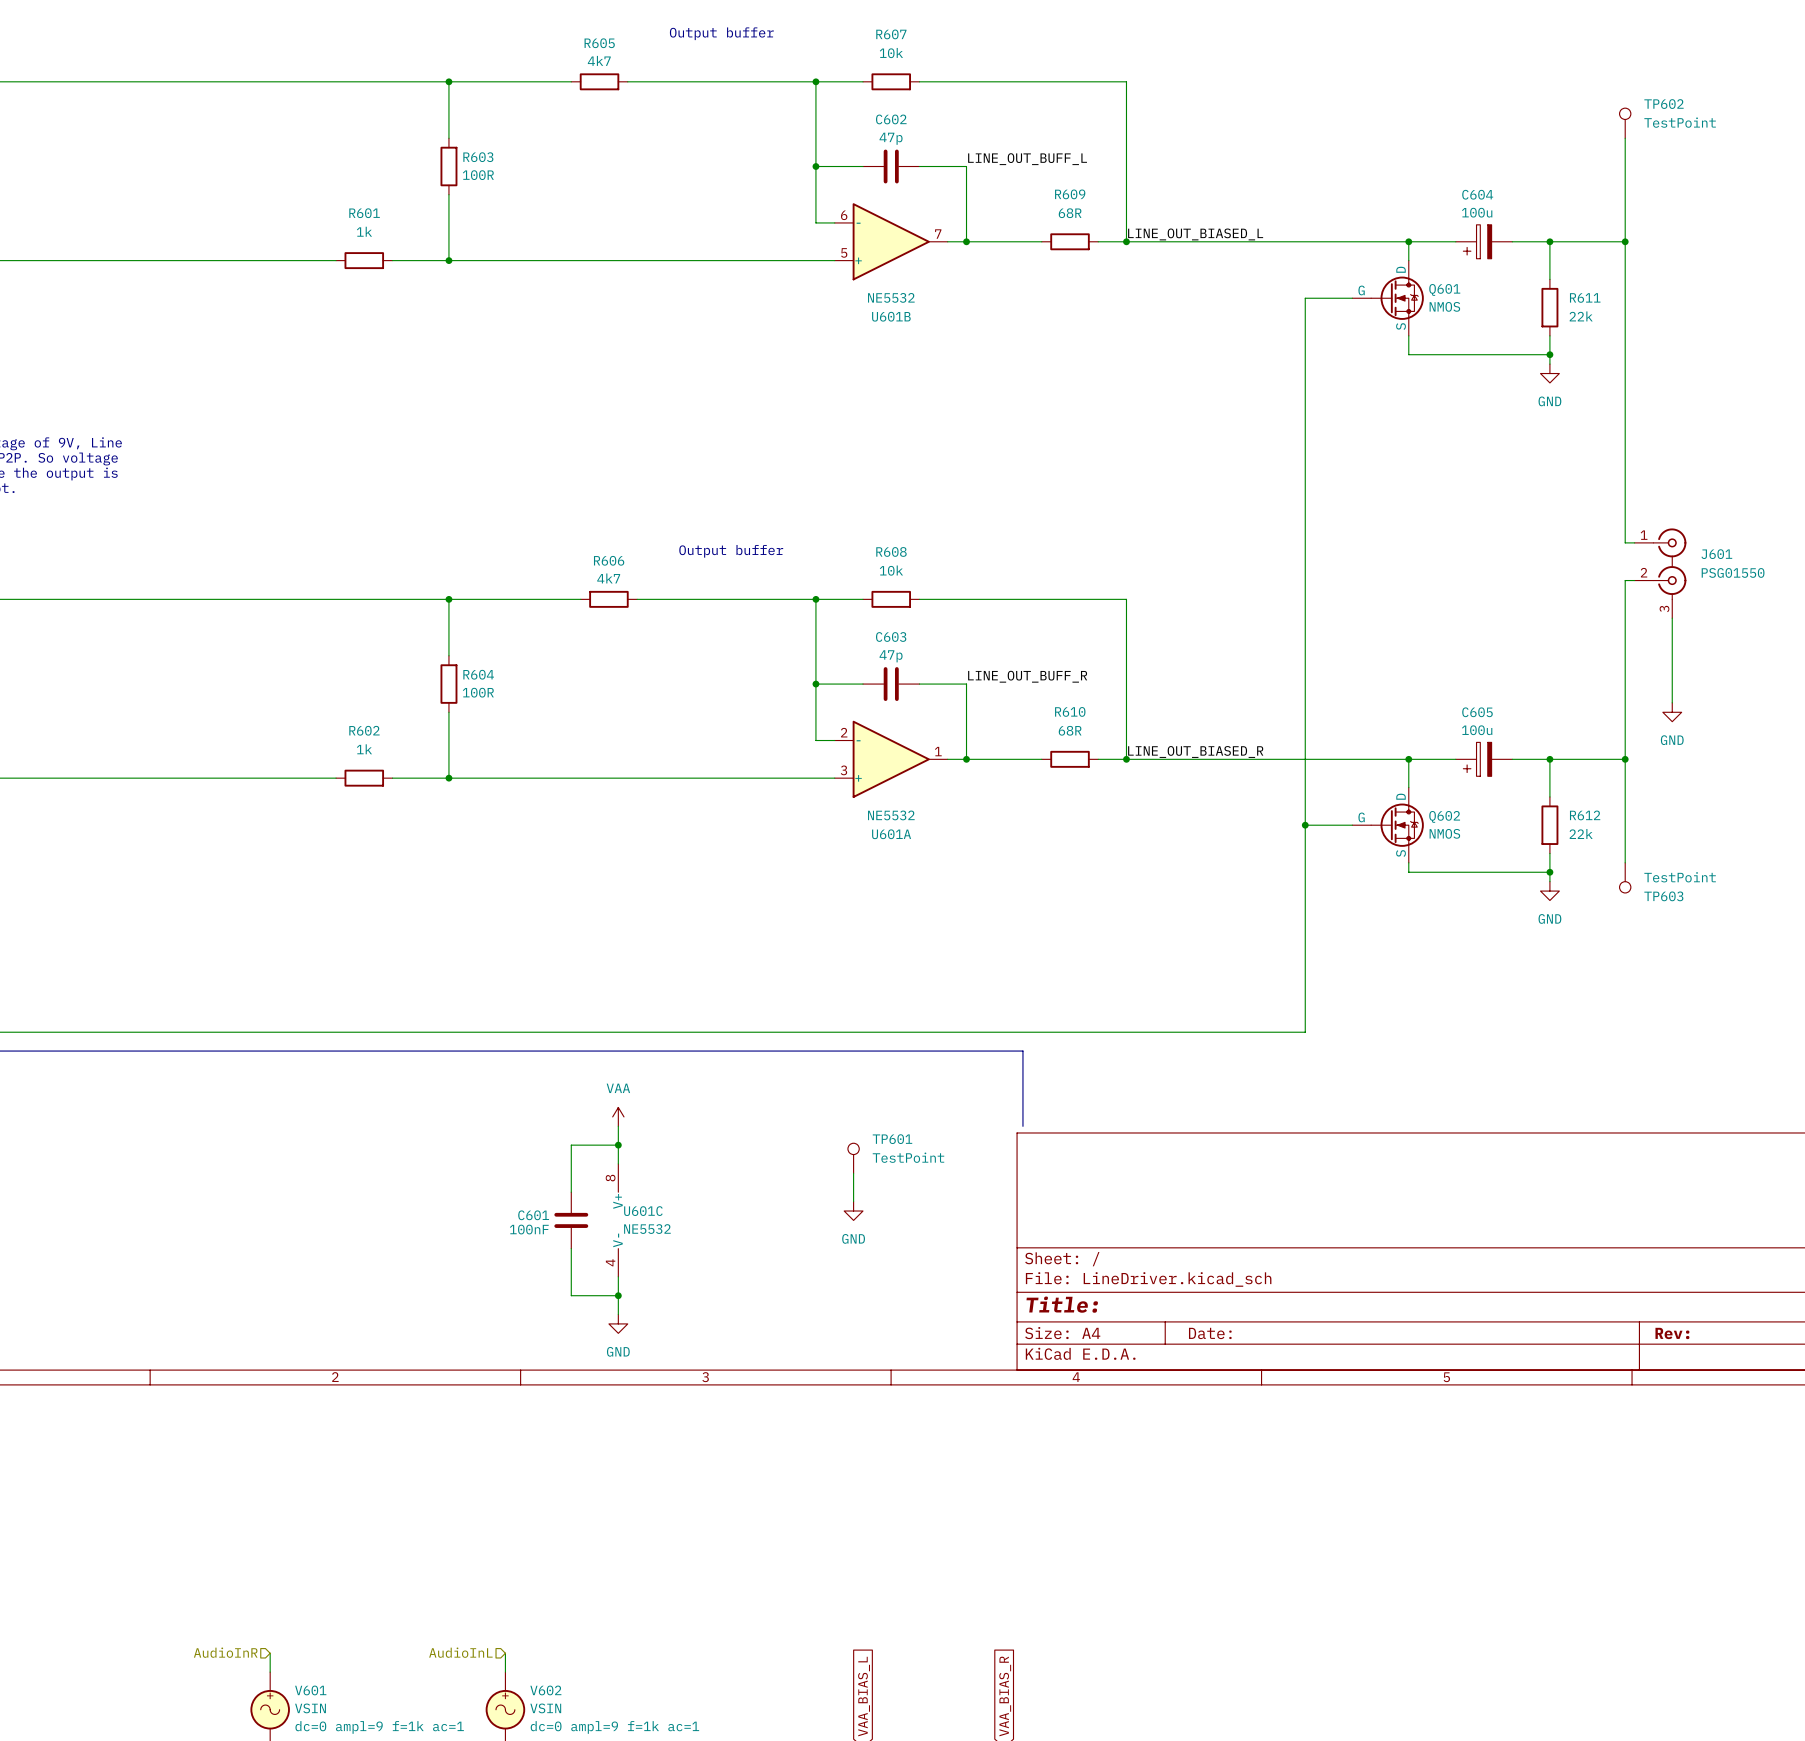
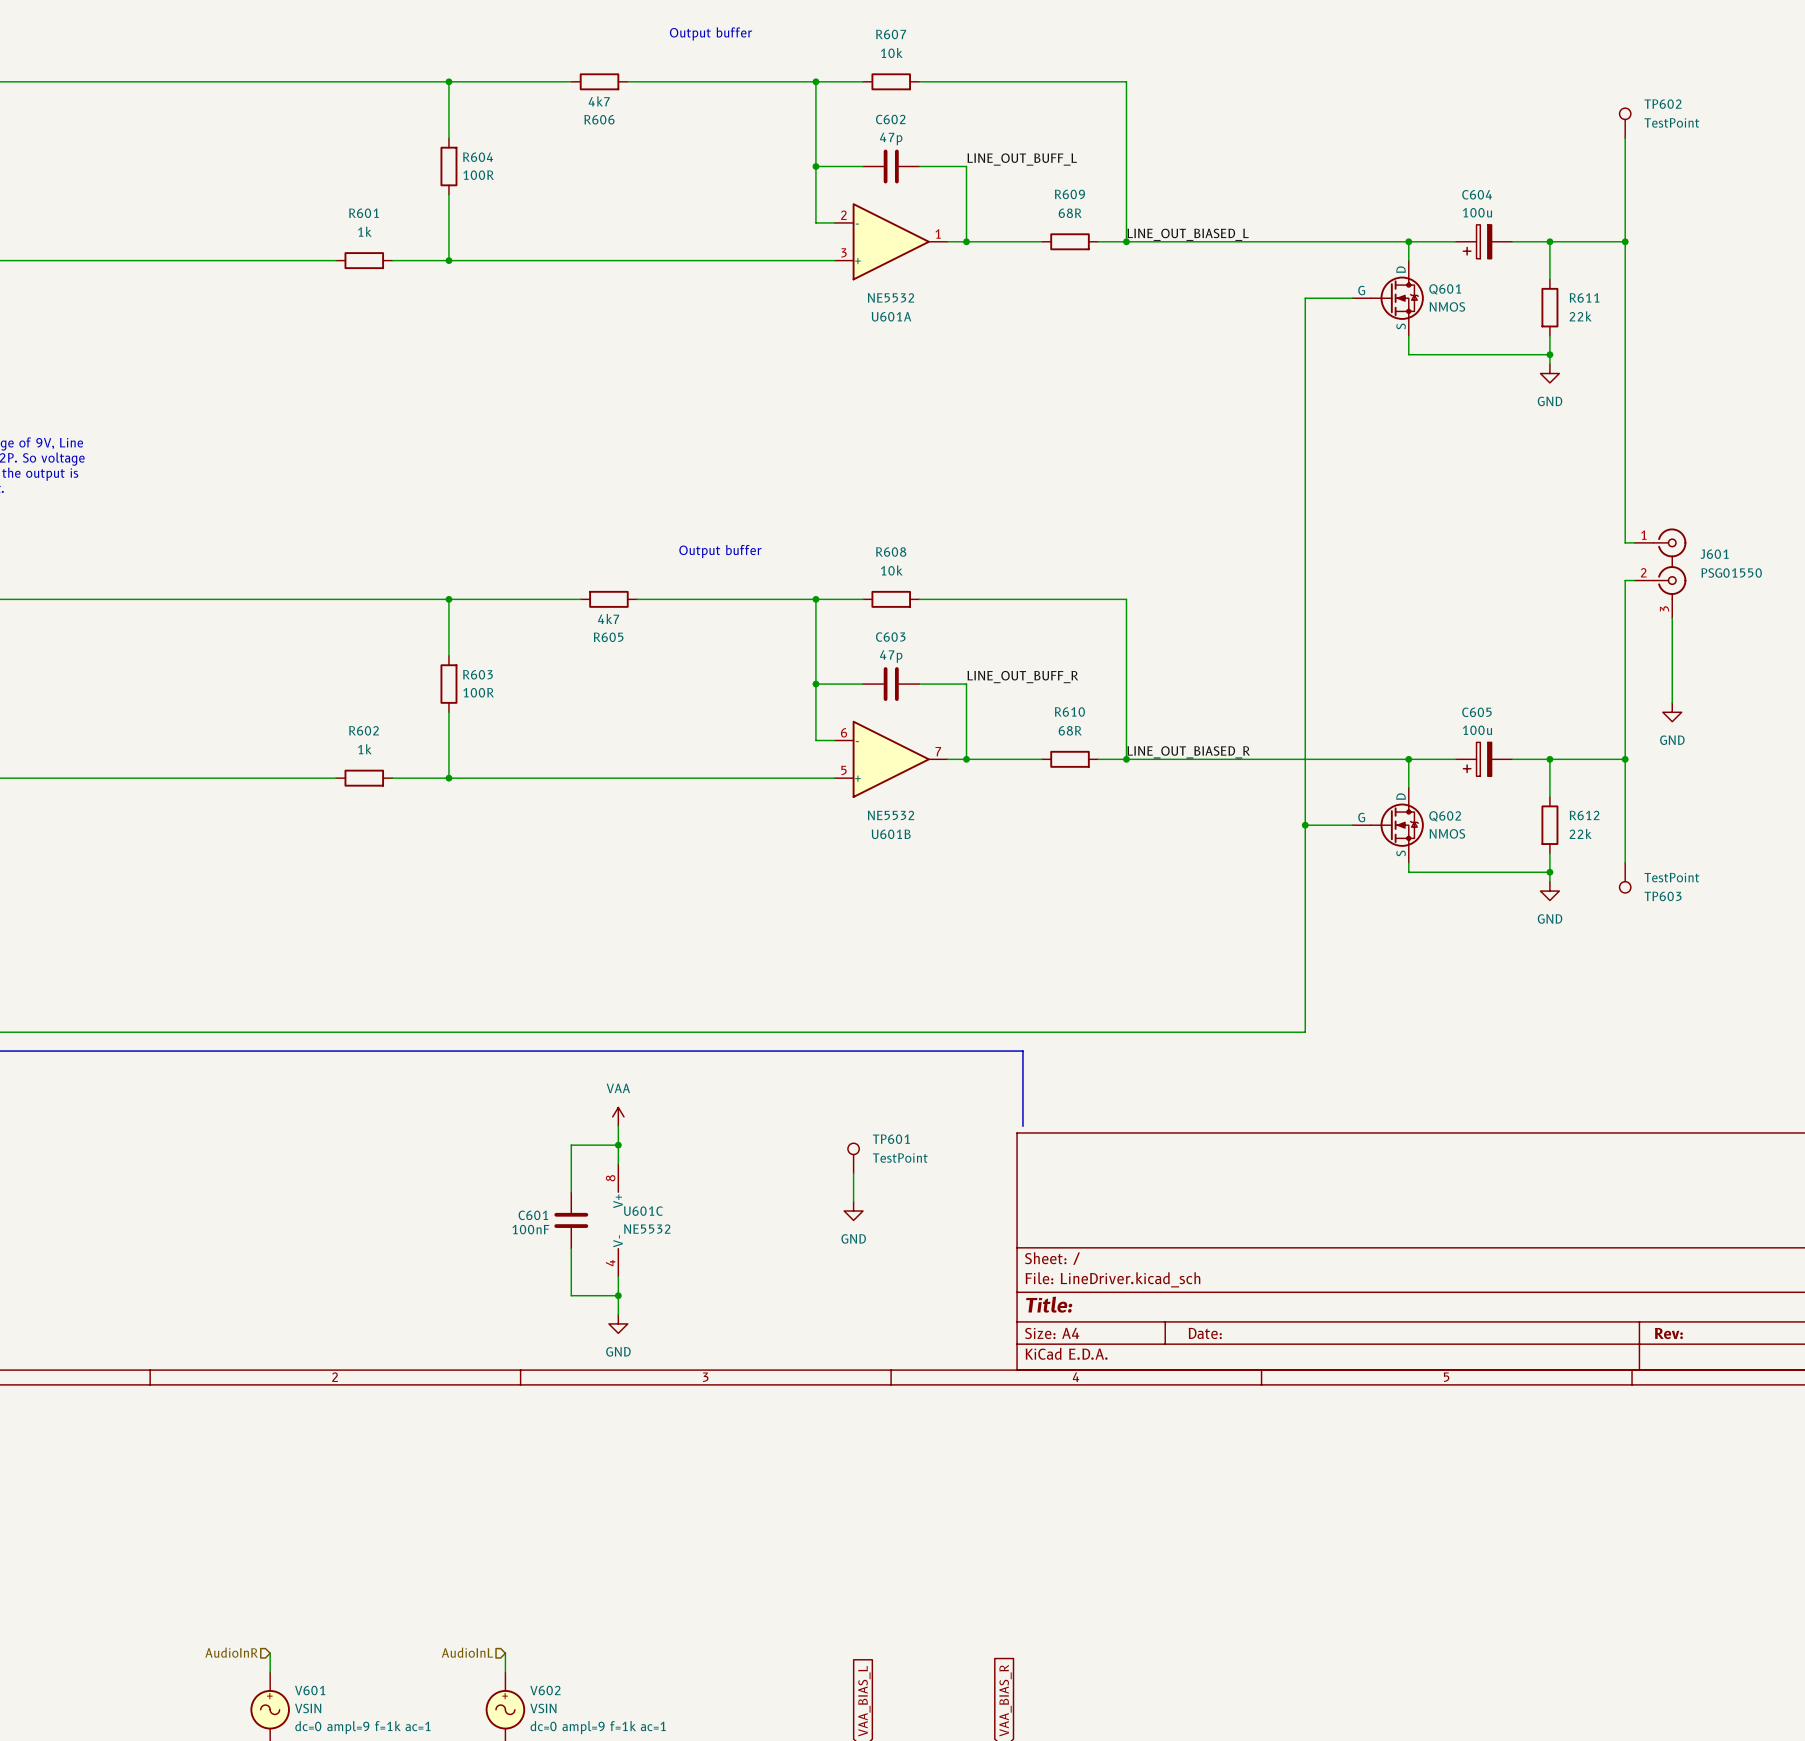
R605 name: R605 (599, 43) -> R606 (599, 119)
R605 value position: 4k7 (599, 60) -> 4k7 (599, 101)
R603 name: R603 (478, 157) -> R604 (478, 157)
U601B position: (891, 241) -> (891, 759)
R606 name: R606 (609, 560) -> R605 (608, 637)
R606 value position: 4k7 (608, 578) -> 4k7 (608, 618)
R604 name: R604 (478, 674) -> R603 (477, 674)
U601A position: (891, 759) -> (891, 241)

